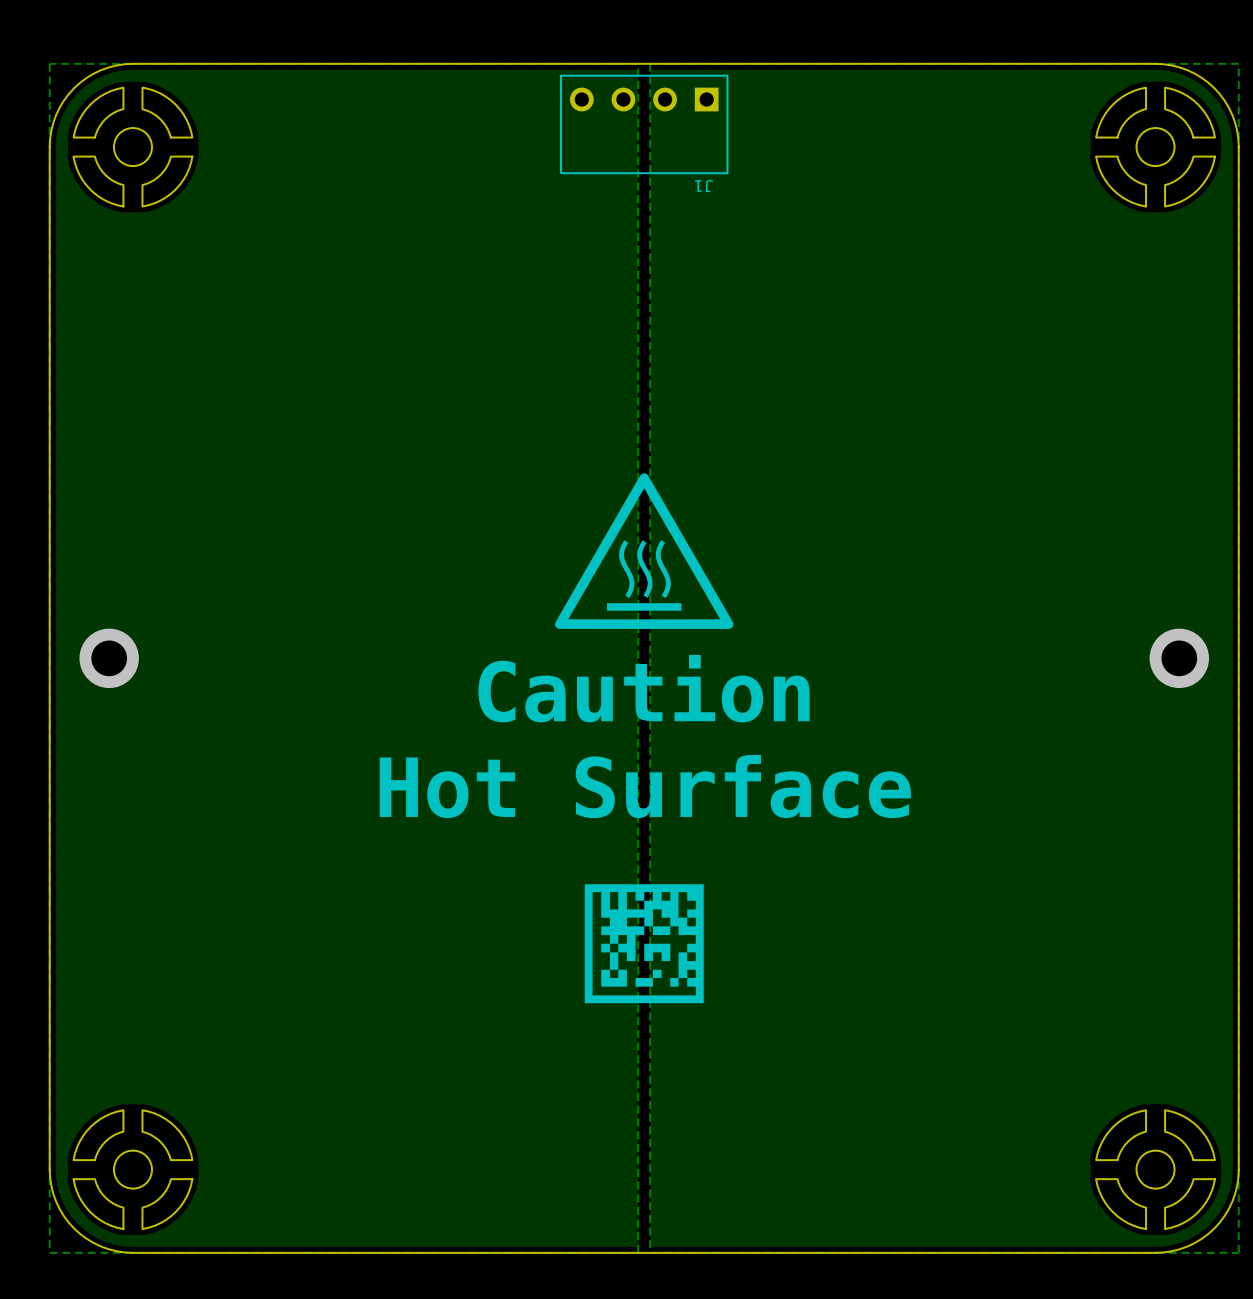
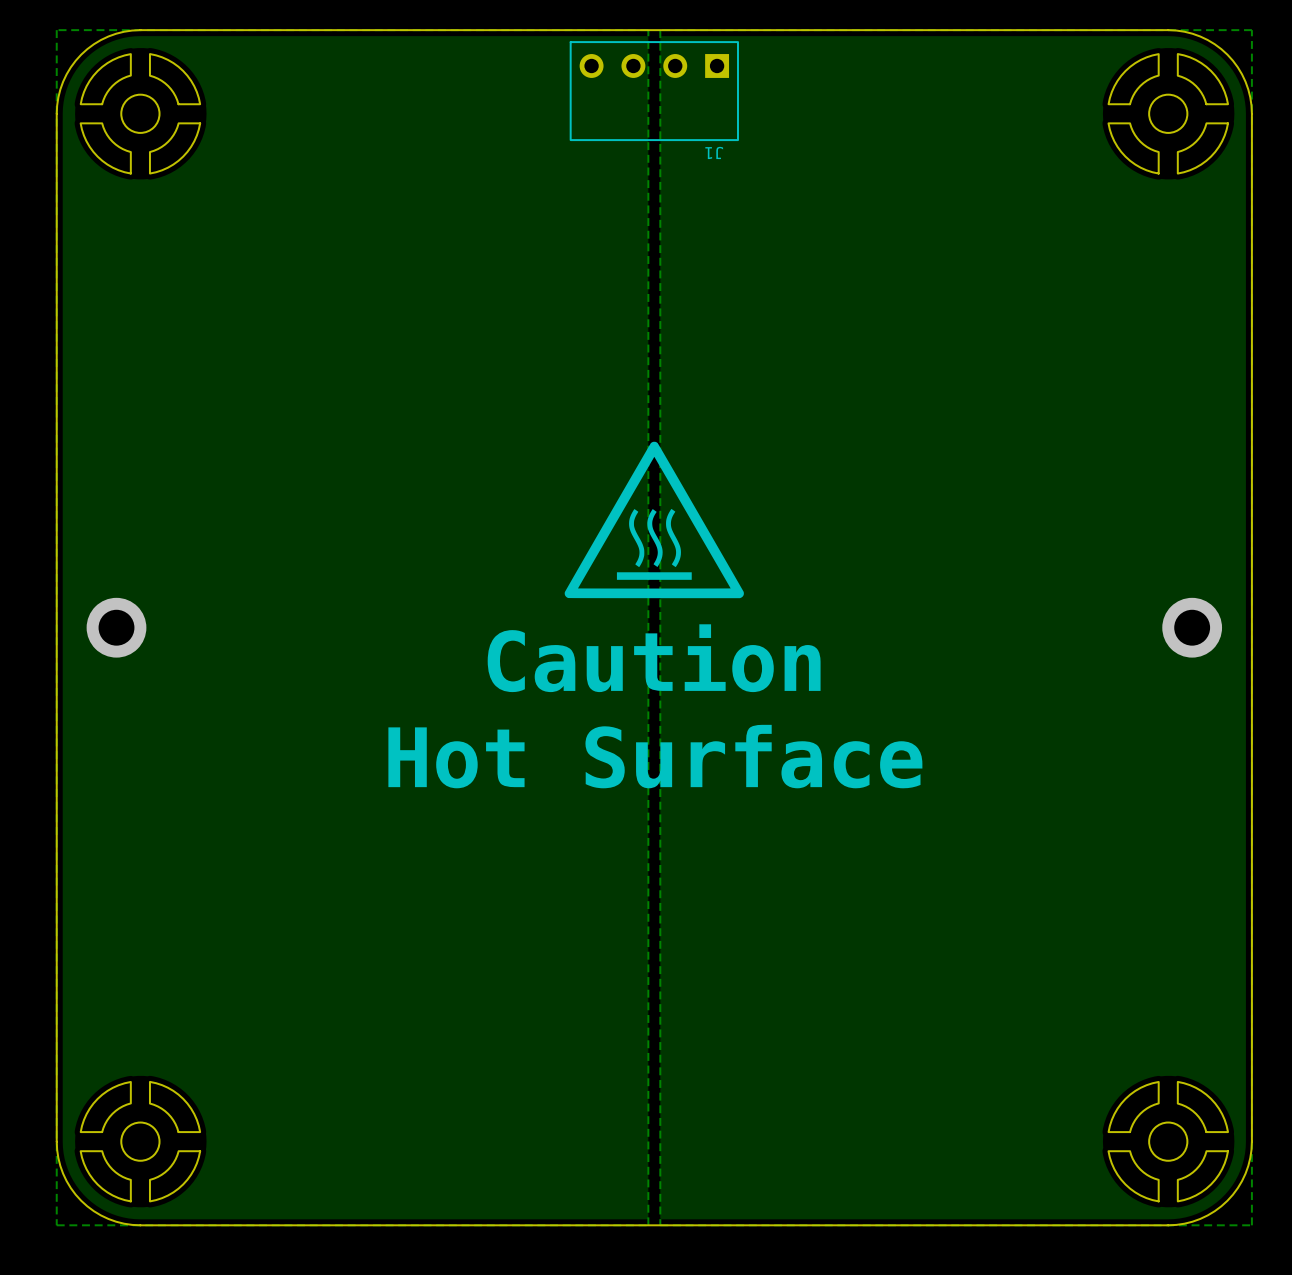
drawing: [584, 884, 704, 1004] -> none

